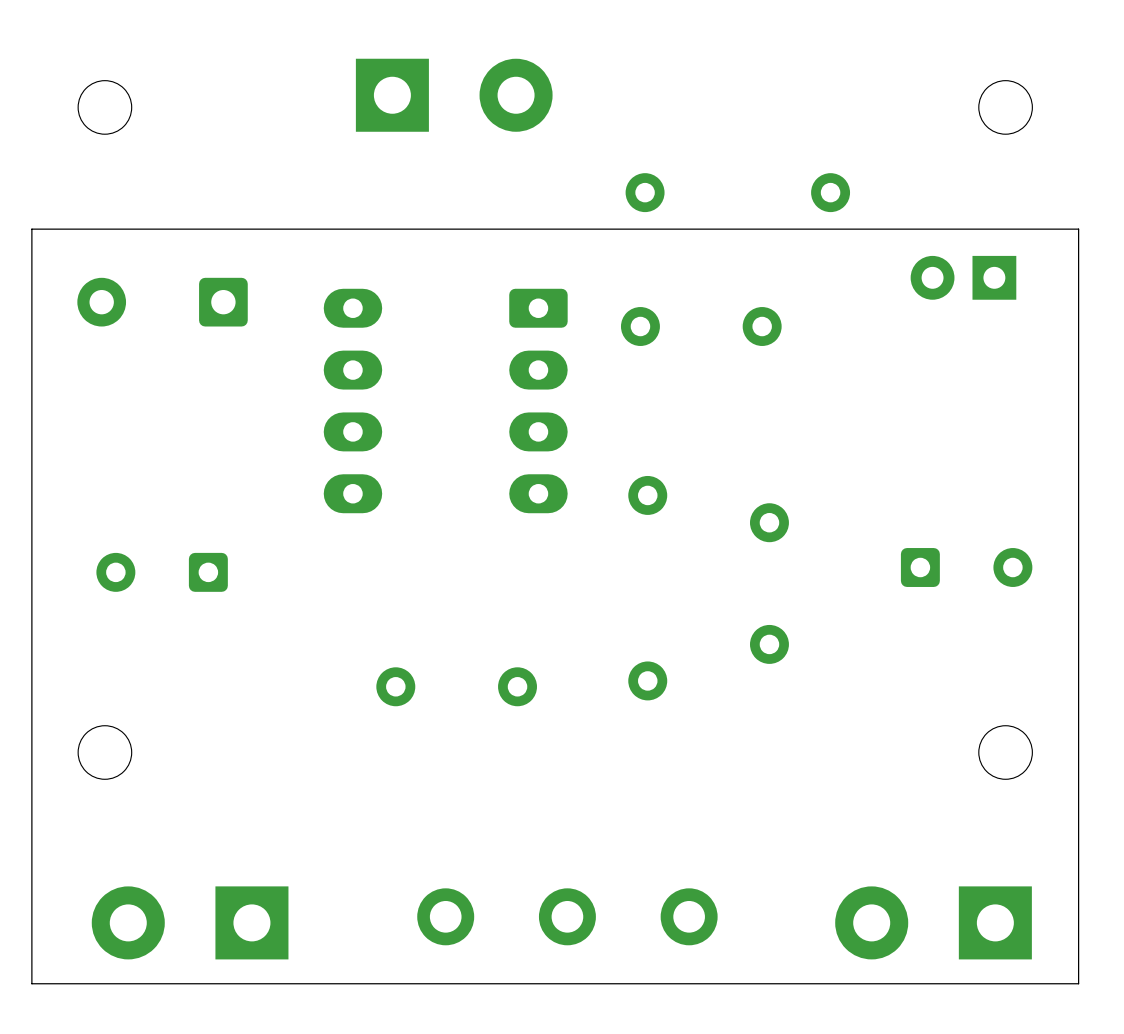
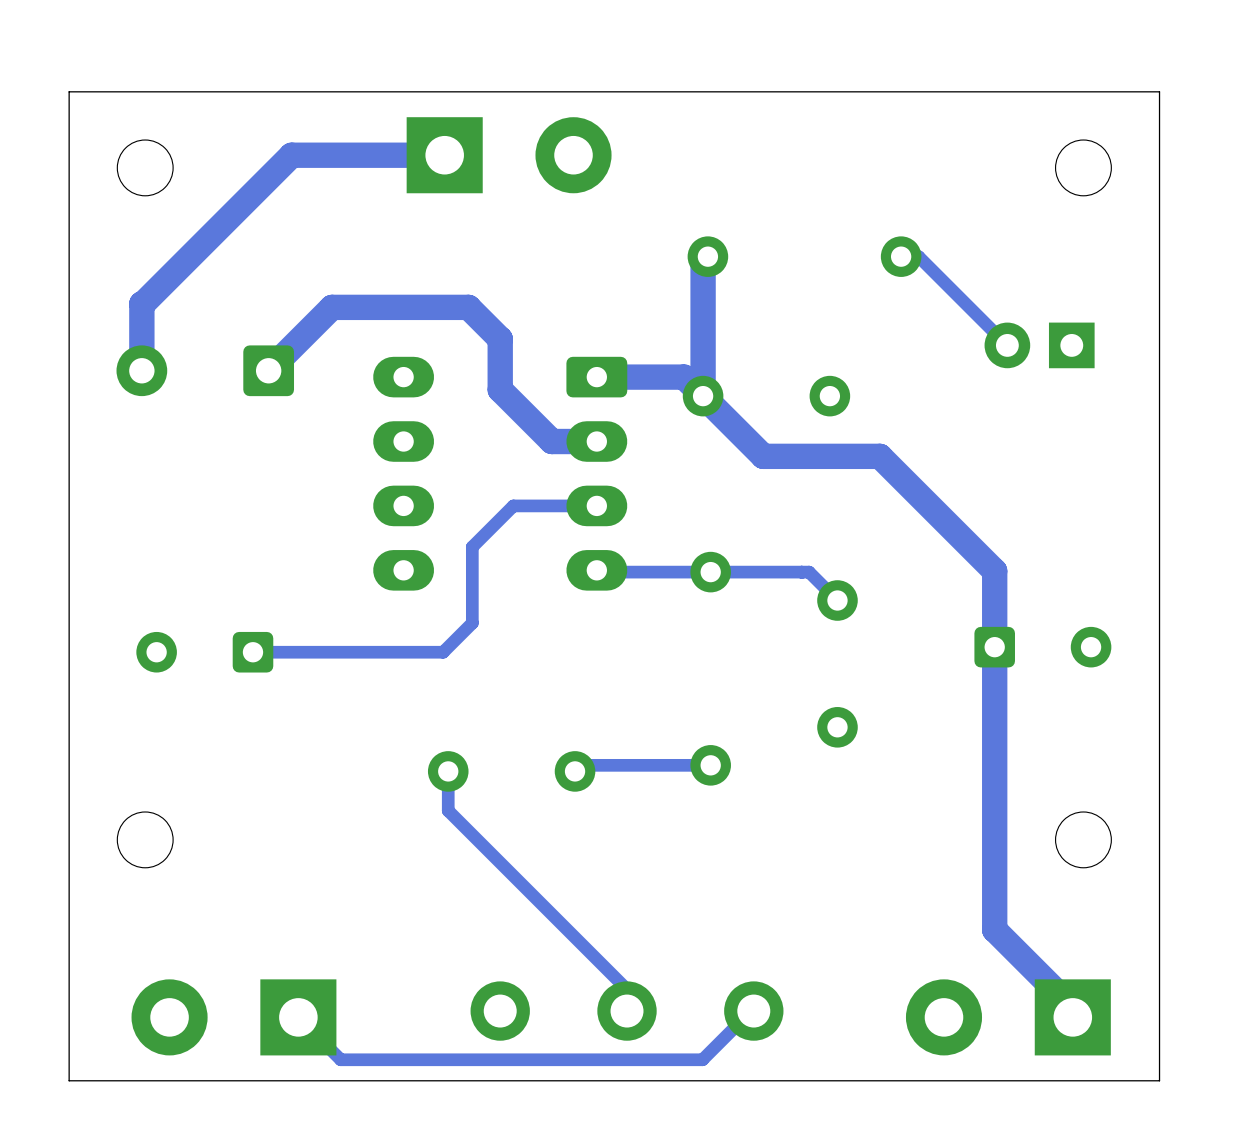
track: none -> (444, 155) (291, 155) (141, 303) (141, 370)
track: none -> (707, 256) (703, 261) (703, 396)
track: none -> (901, 256) (918, 256) (1007, 345)
board edge: (1078, 229) (31, 229) -> (1159, 294) (1159, 91) (69, 91) (69, 294)
track: none -> (268, 370) (332, 307) (468, 307) (500, 339) (500, 389) (551, 441) (596, 441)
track: none -> (596, 377) (684, 377) (763, 456) (879, 456) (994, 571) (994, 929) (1072, 1008) (1072, 1017)
track: none -> (596, 505) (513, 505) (472, 547) (472, 623) (443, 652) (252, 652)
track: none -> (596, 570) (598, 572) (809, 572) (837, 600)
track: none -> (710, 765) (582, 765) (575, 771)
track: none -> (448, 771) (448, 810) (627, 989) (627, 1011)
track: none -> (753, 1008) (702, 1059) (340, 1059) (298, 1017)

